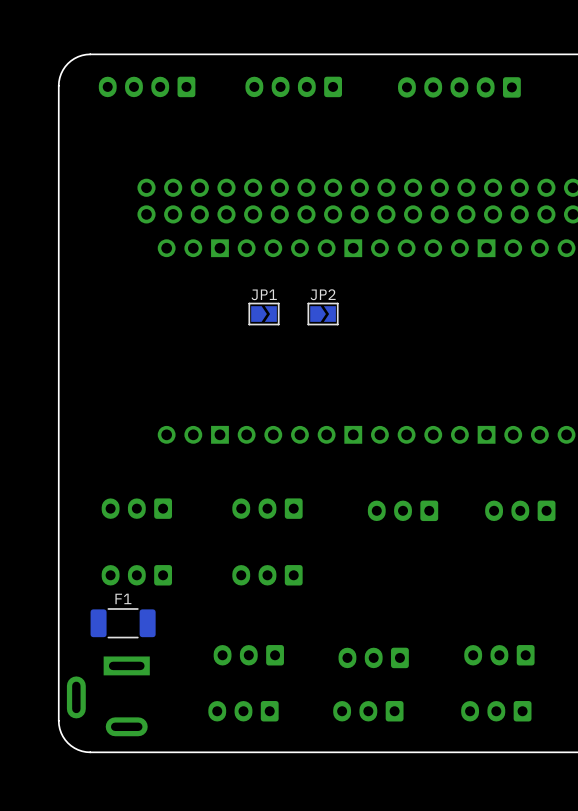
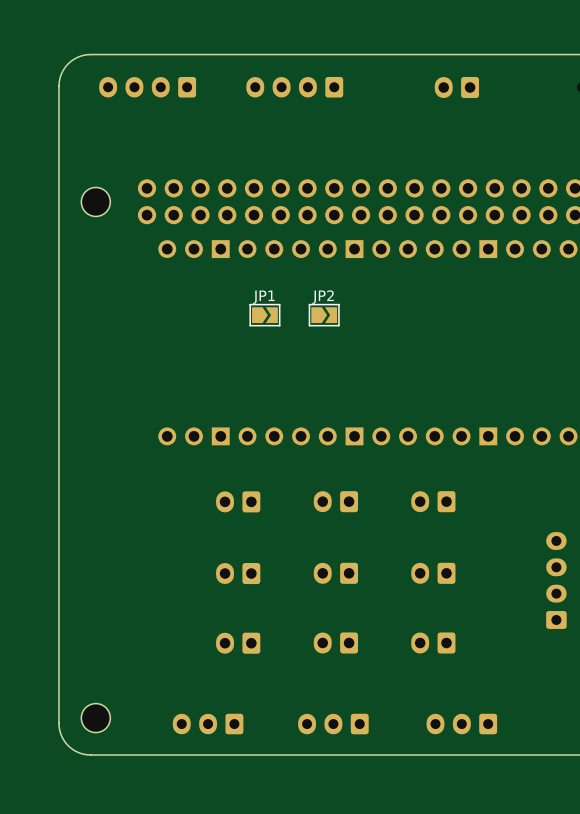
part footprint: [398, 77, 521, 98] -> [434, 76, 480, 99]
part: none -> (95, 201)
part: none -> (335, 501)
part: none -> (433, 501)
part: none -> (238, 501)
part: (136, 508) -> none
part: (267, 508) -> none
part: (403, 510) -> none
part: (520, 510) -> none
part: none -> (238, 573)
part: none -> (335, 573)
part: none -> (433, 573)
part: (136, 575) -> none
part: (267, 575) -> none
part: none -> (556, 580)
F1: (123, 623) -> none
part: none -> (238, 643)
part: none -> (335, 642)
part: none -> (433, 642)
part: (248, 655) -> none
part: (499, 655) -> none
part: (373, 657) -> none
part: (108, 696) -> none
part position: (243, 711) -> (208, 724)
part position: (368, 711) -> (333, 724)
part position: (496, 711) -> (461, 724)
part: none -> (95, 718)

